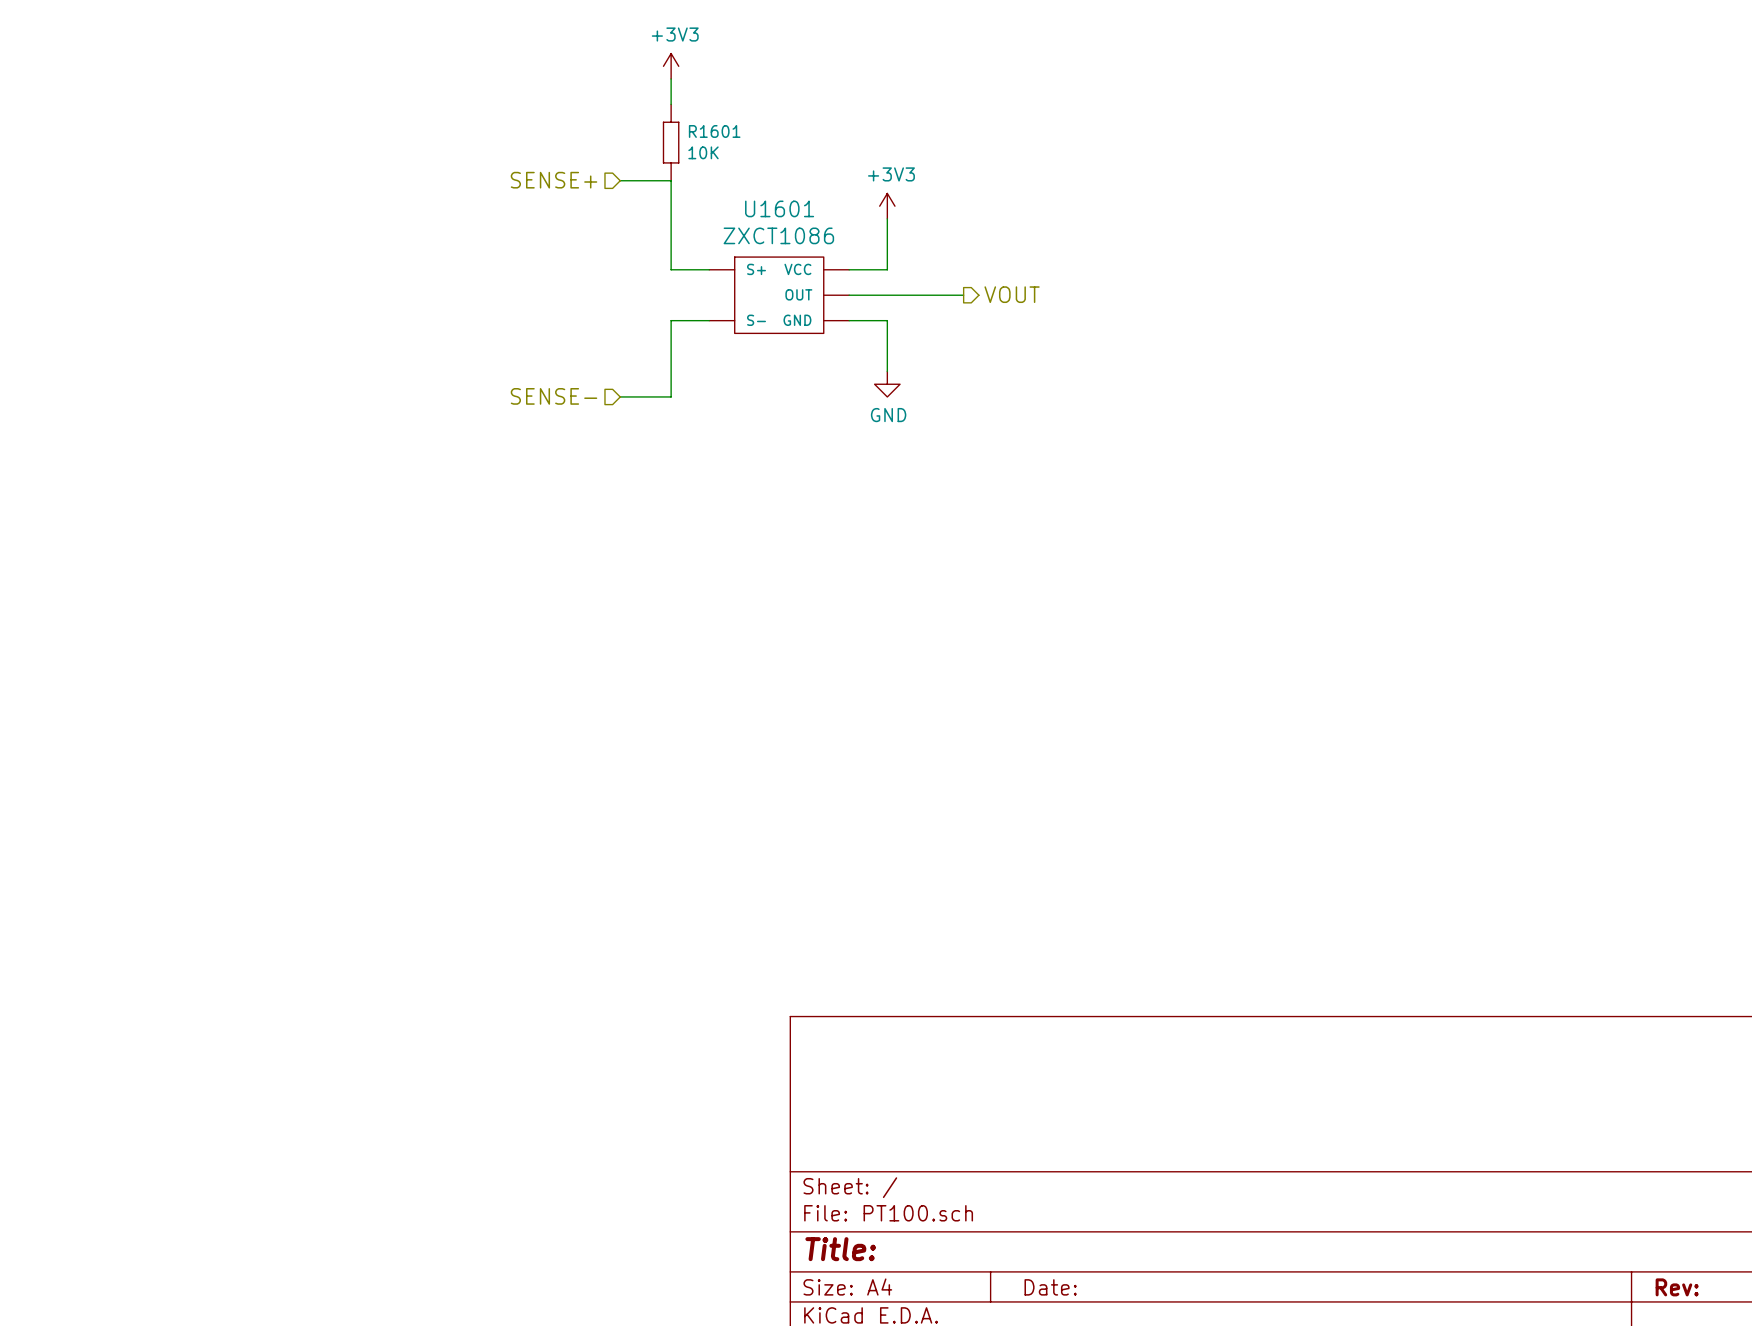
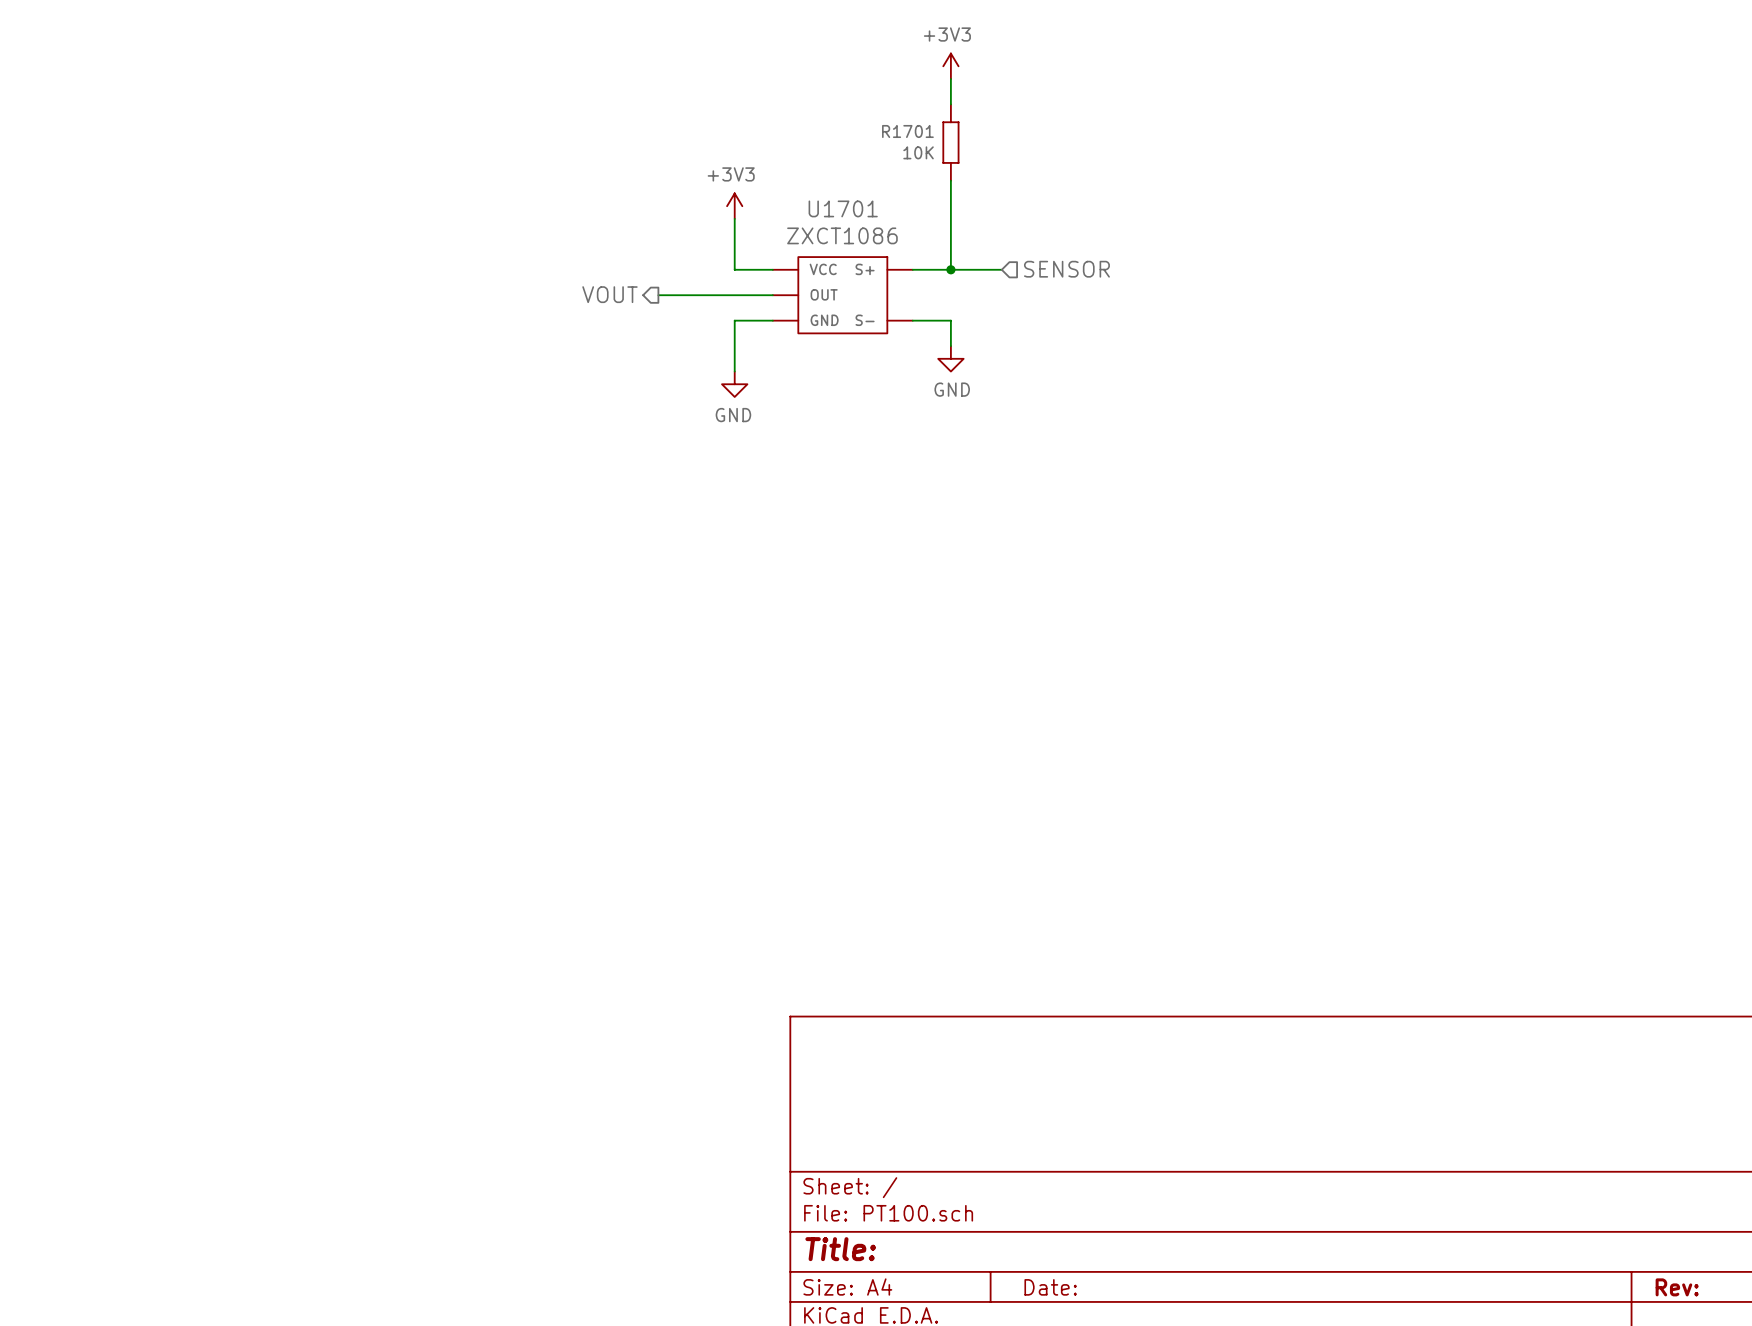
power symbol: +3V3 (671, 66) -> none
power symbol: none -> +3V3 (950, 66)
wire: (671, 79) (671, 104) -> none
wire: none -> (950, 79) (950, 104)
R1601: 10K (671, 142) -> none
R1701: none -> 10K (950, 142)
hierarchical label: SENSE+ (554, 180) -> none
wire: (620, 180) (671, 180) (671, 269) (709, 269) -> none
wire: none -> (950, 180) (950, 269)
power symbol: none -> +3V3 (734, 206)
power symbol: +3V3 (887, 206) -> none
wire: none -> (734, 218) (734, 269) (772, 269)
wire: (887, 218) (887, 269) (849, 269) -> none
wire: none -> (912, 269) (1001, 269)
junction: none -> (950, 269)
hierarchical label: none -> SENSOR (1066, 269)
hierarchical label: none -> VOUT (609, 294)
hierarchical label: VOUT (1012, 294) -> none
U1601: ZXCT1086 (779, 295) -> none
U1701: none -> ZXCT1086 (842, 295)
wire: (849, 295) (963, 295) -> (658, 295) (772, 295)
wire: (709, 320) (671, 320) (671, 396) (620, 396) -> none
wire: none -> (772, 320) (734, 320) (734, 371)
wire: (849, 320) (887, 320) (887, 371) -> none
wire: none -> (912, 320) (950, 320) (950, 346)
power symbol: none -> GND (734, 384)
power symbol position: GND (887, 384) -> GND (950, 358)
hierarchical label: SENSE- (554, 396) -> none

